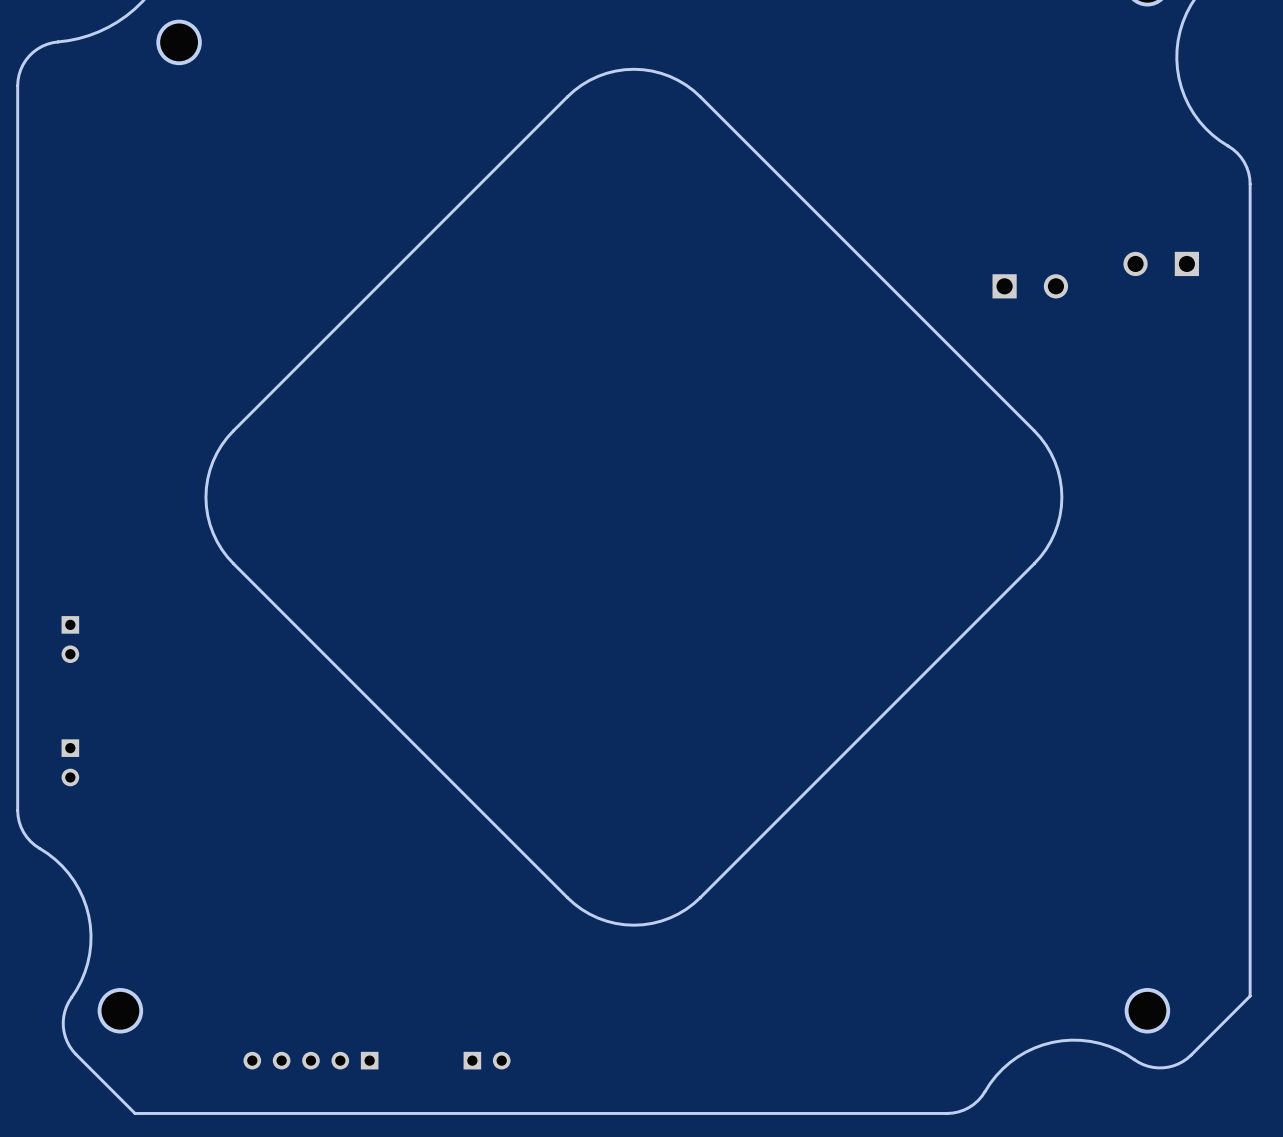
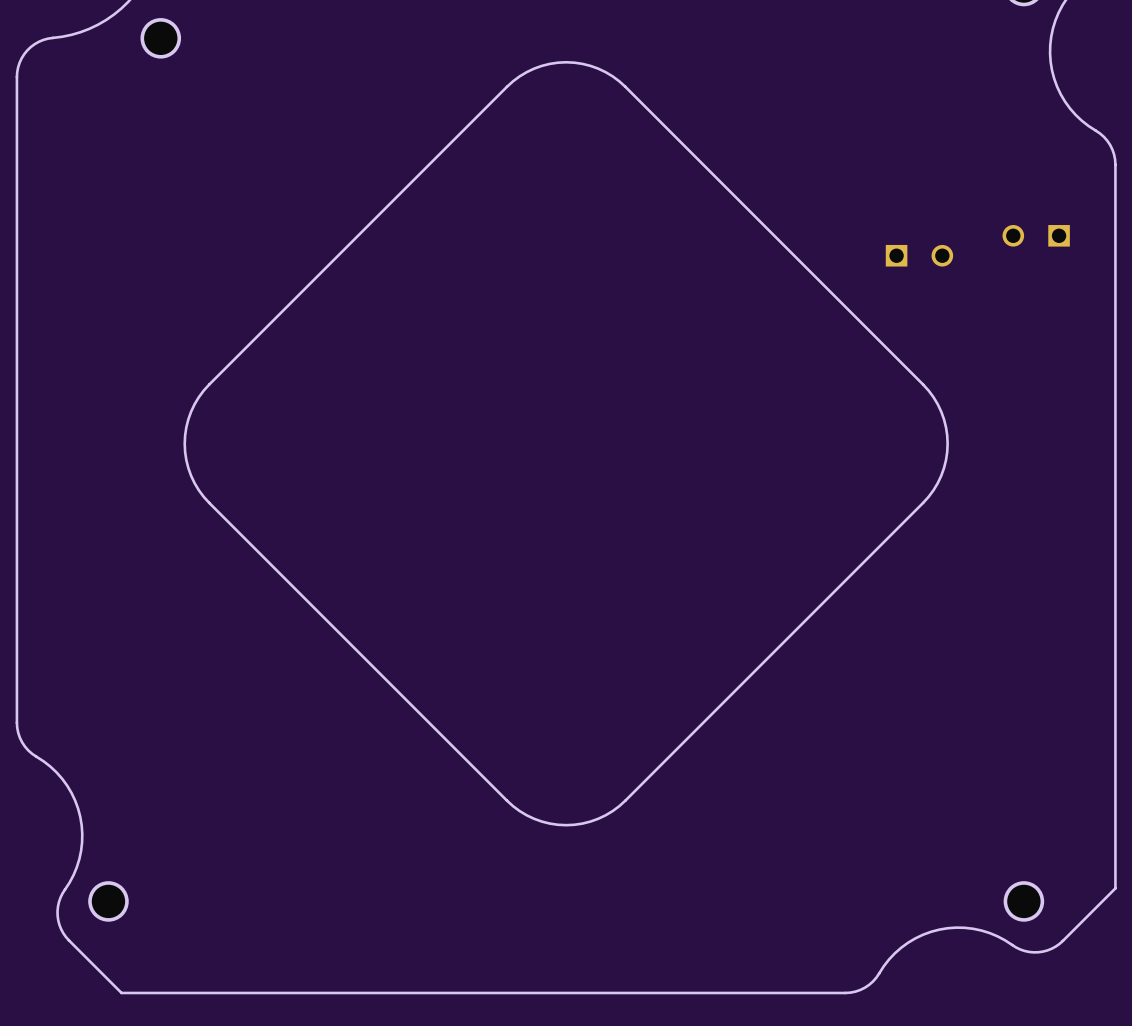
part: (70, 639) -> none
part: (70, 762) -> none
part: (310, 1060) -> none
part: (487, 1060) -> none

